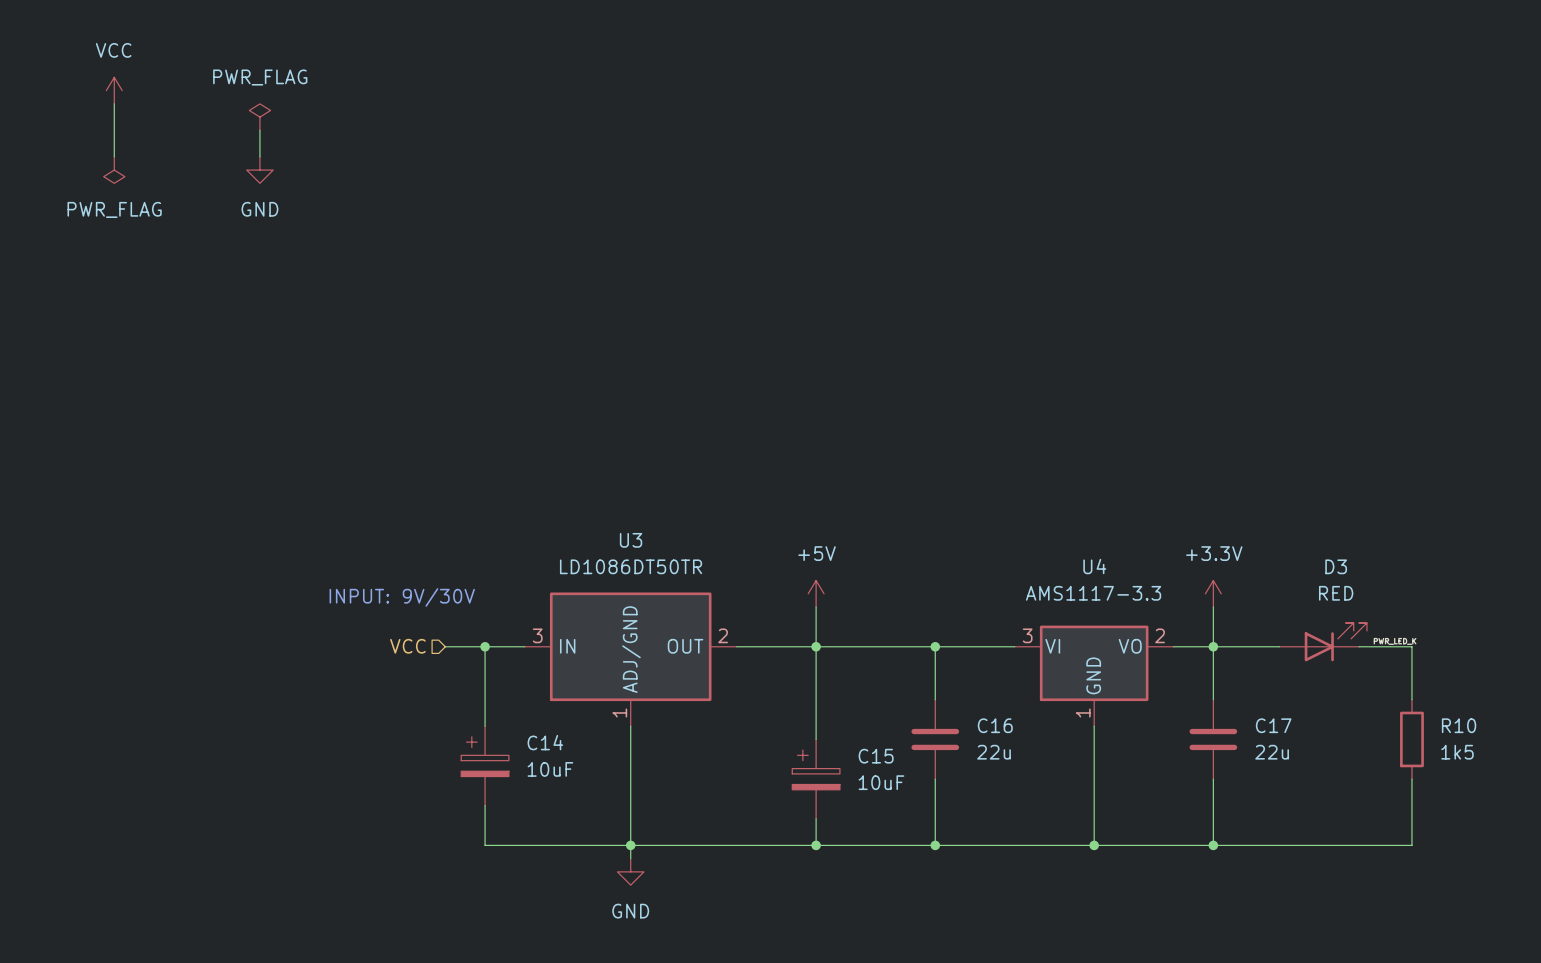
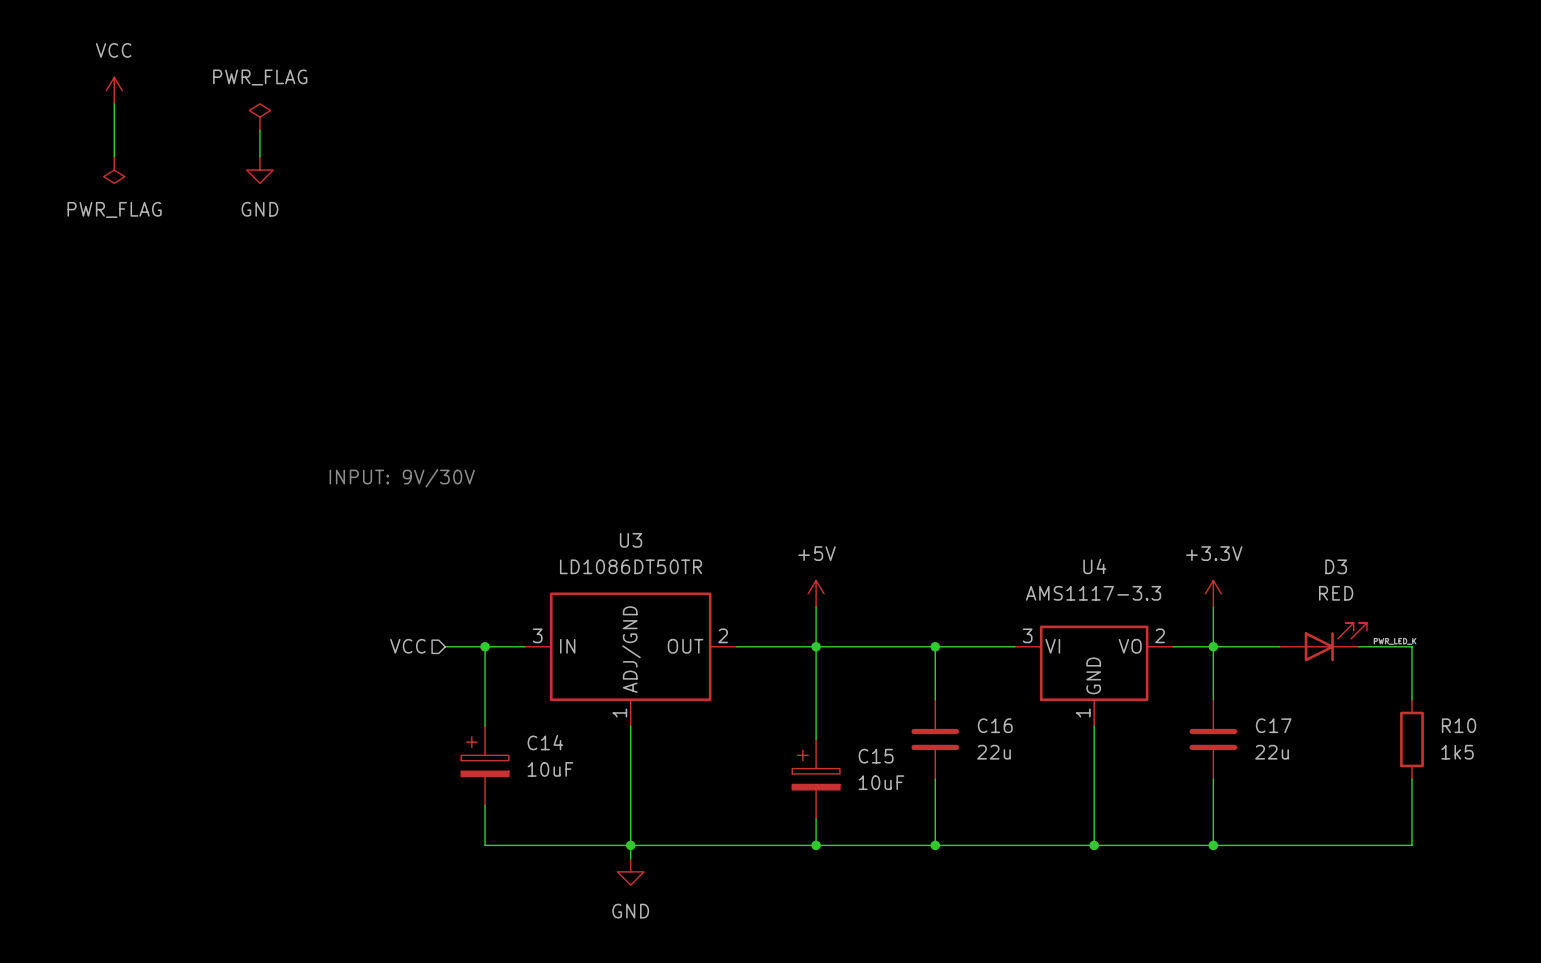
text position: INPUT: 9V/30V (402, 597) -> INPUT: 9V/30V (402, 478)

